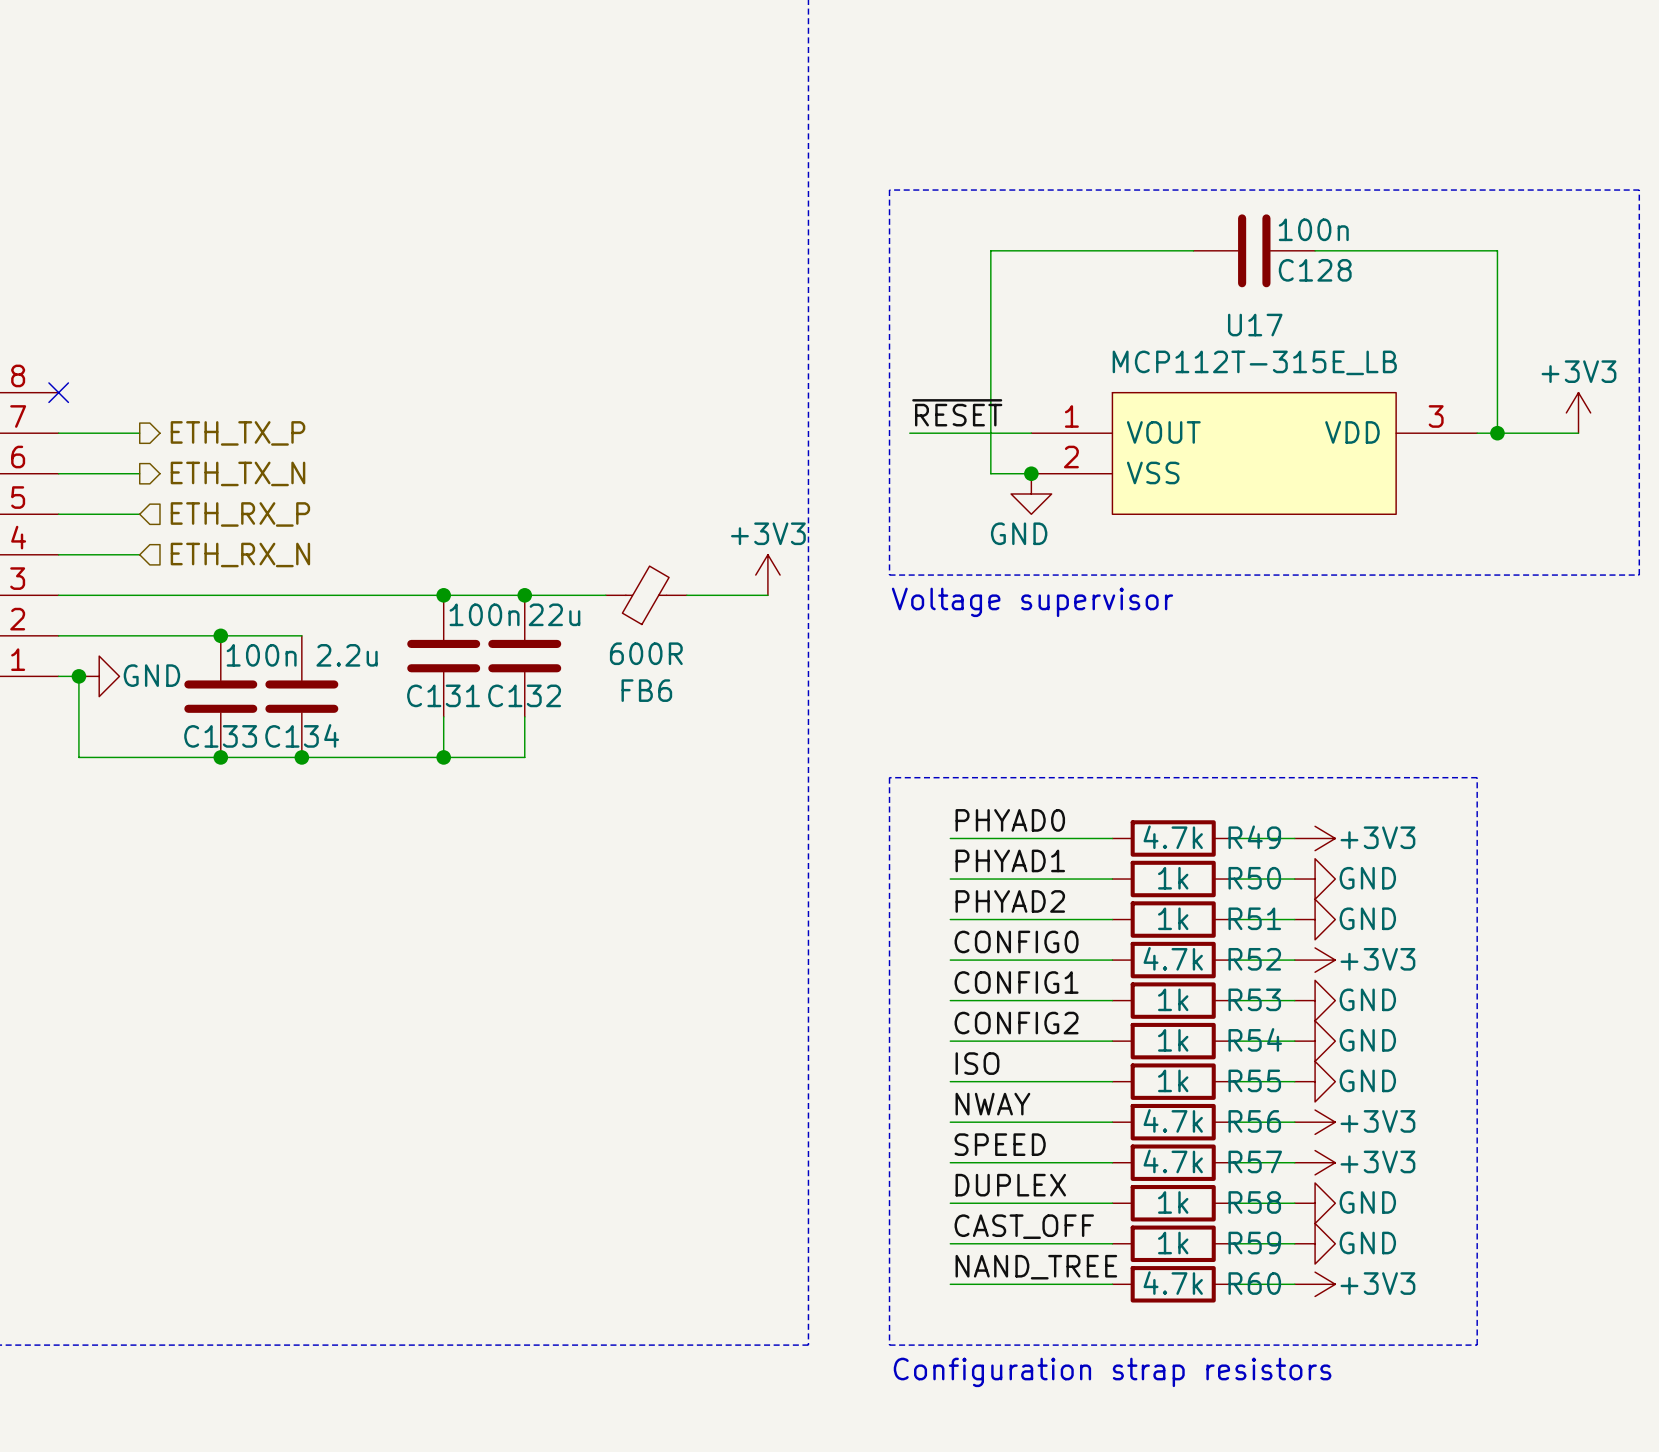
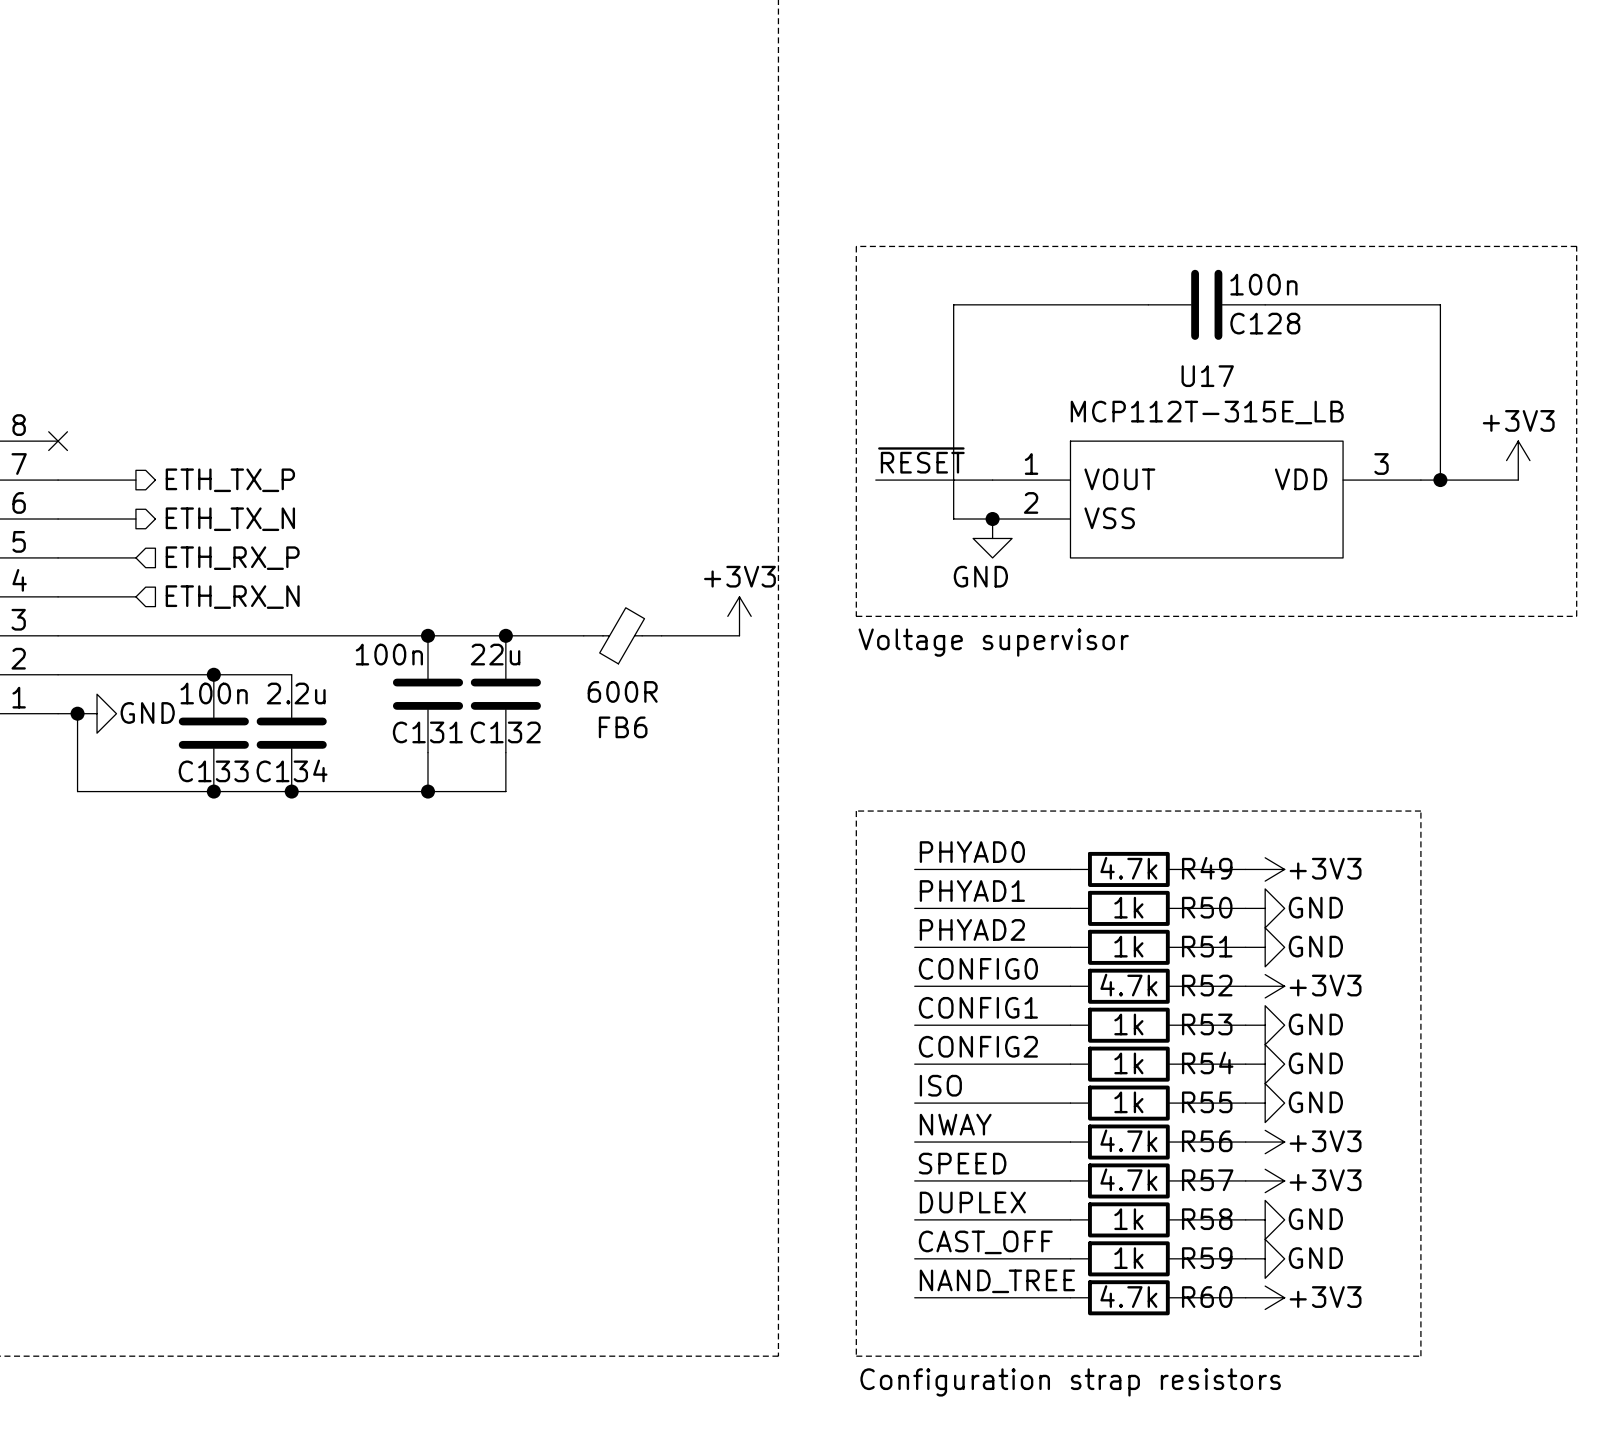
C131 value position: 100n (484, 614) -> 100n (389, 654)
C132 value position: 22u (554, 614) -> 22u (495, 654)
C133 value position: 100n (261, 655) -> 100n (214, 693)
C134 value position: 2.2u (347, 655) -> 2.2u (296, 693)

